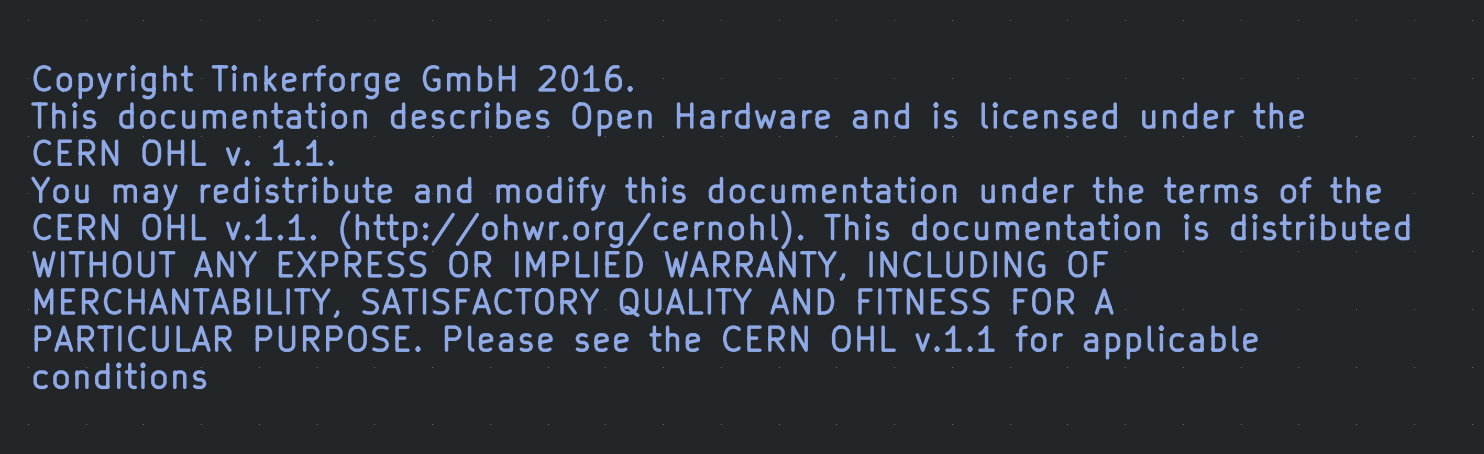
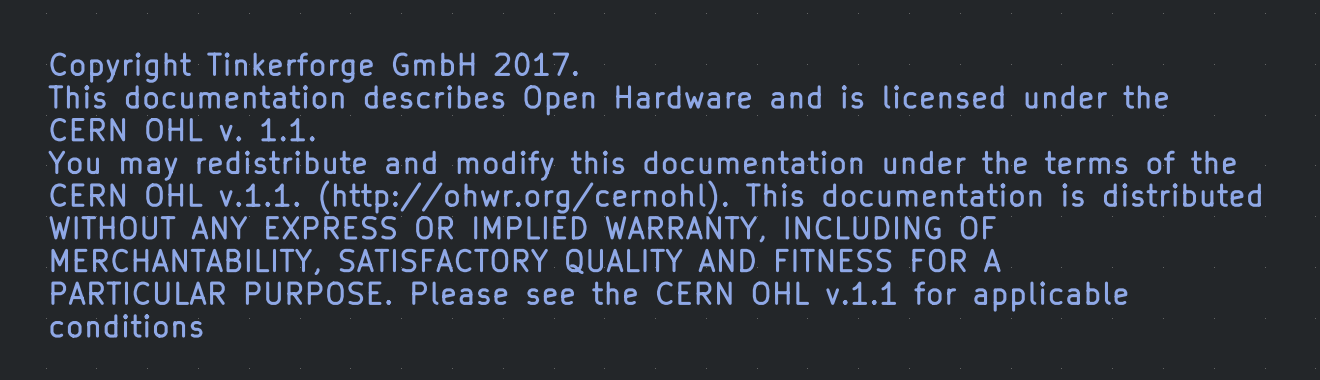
text: Copyright Tinkerforge GmbH 2016. (333, 82) -> Copyright Tinkerforge GmbH 2017. (314, 67)

